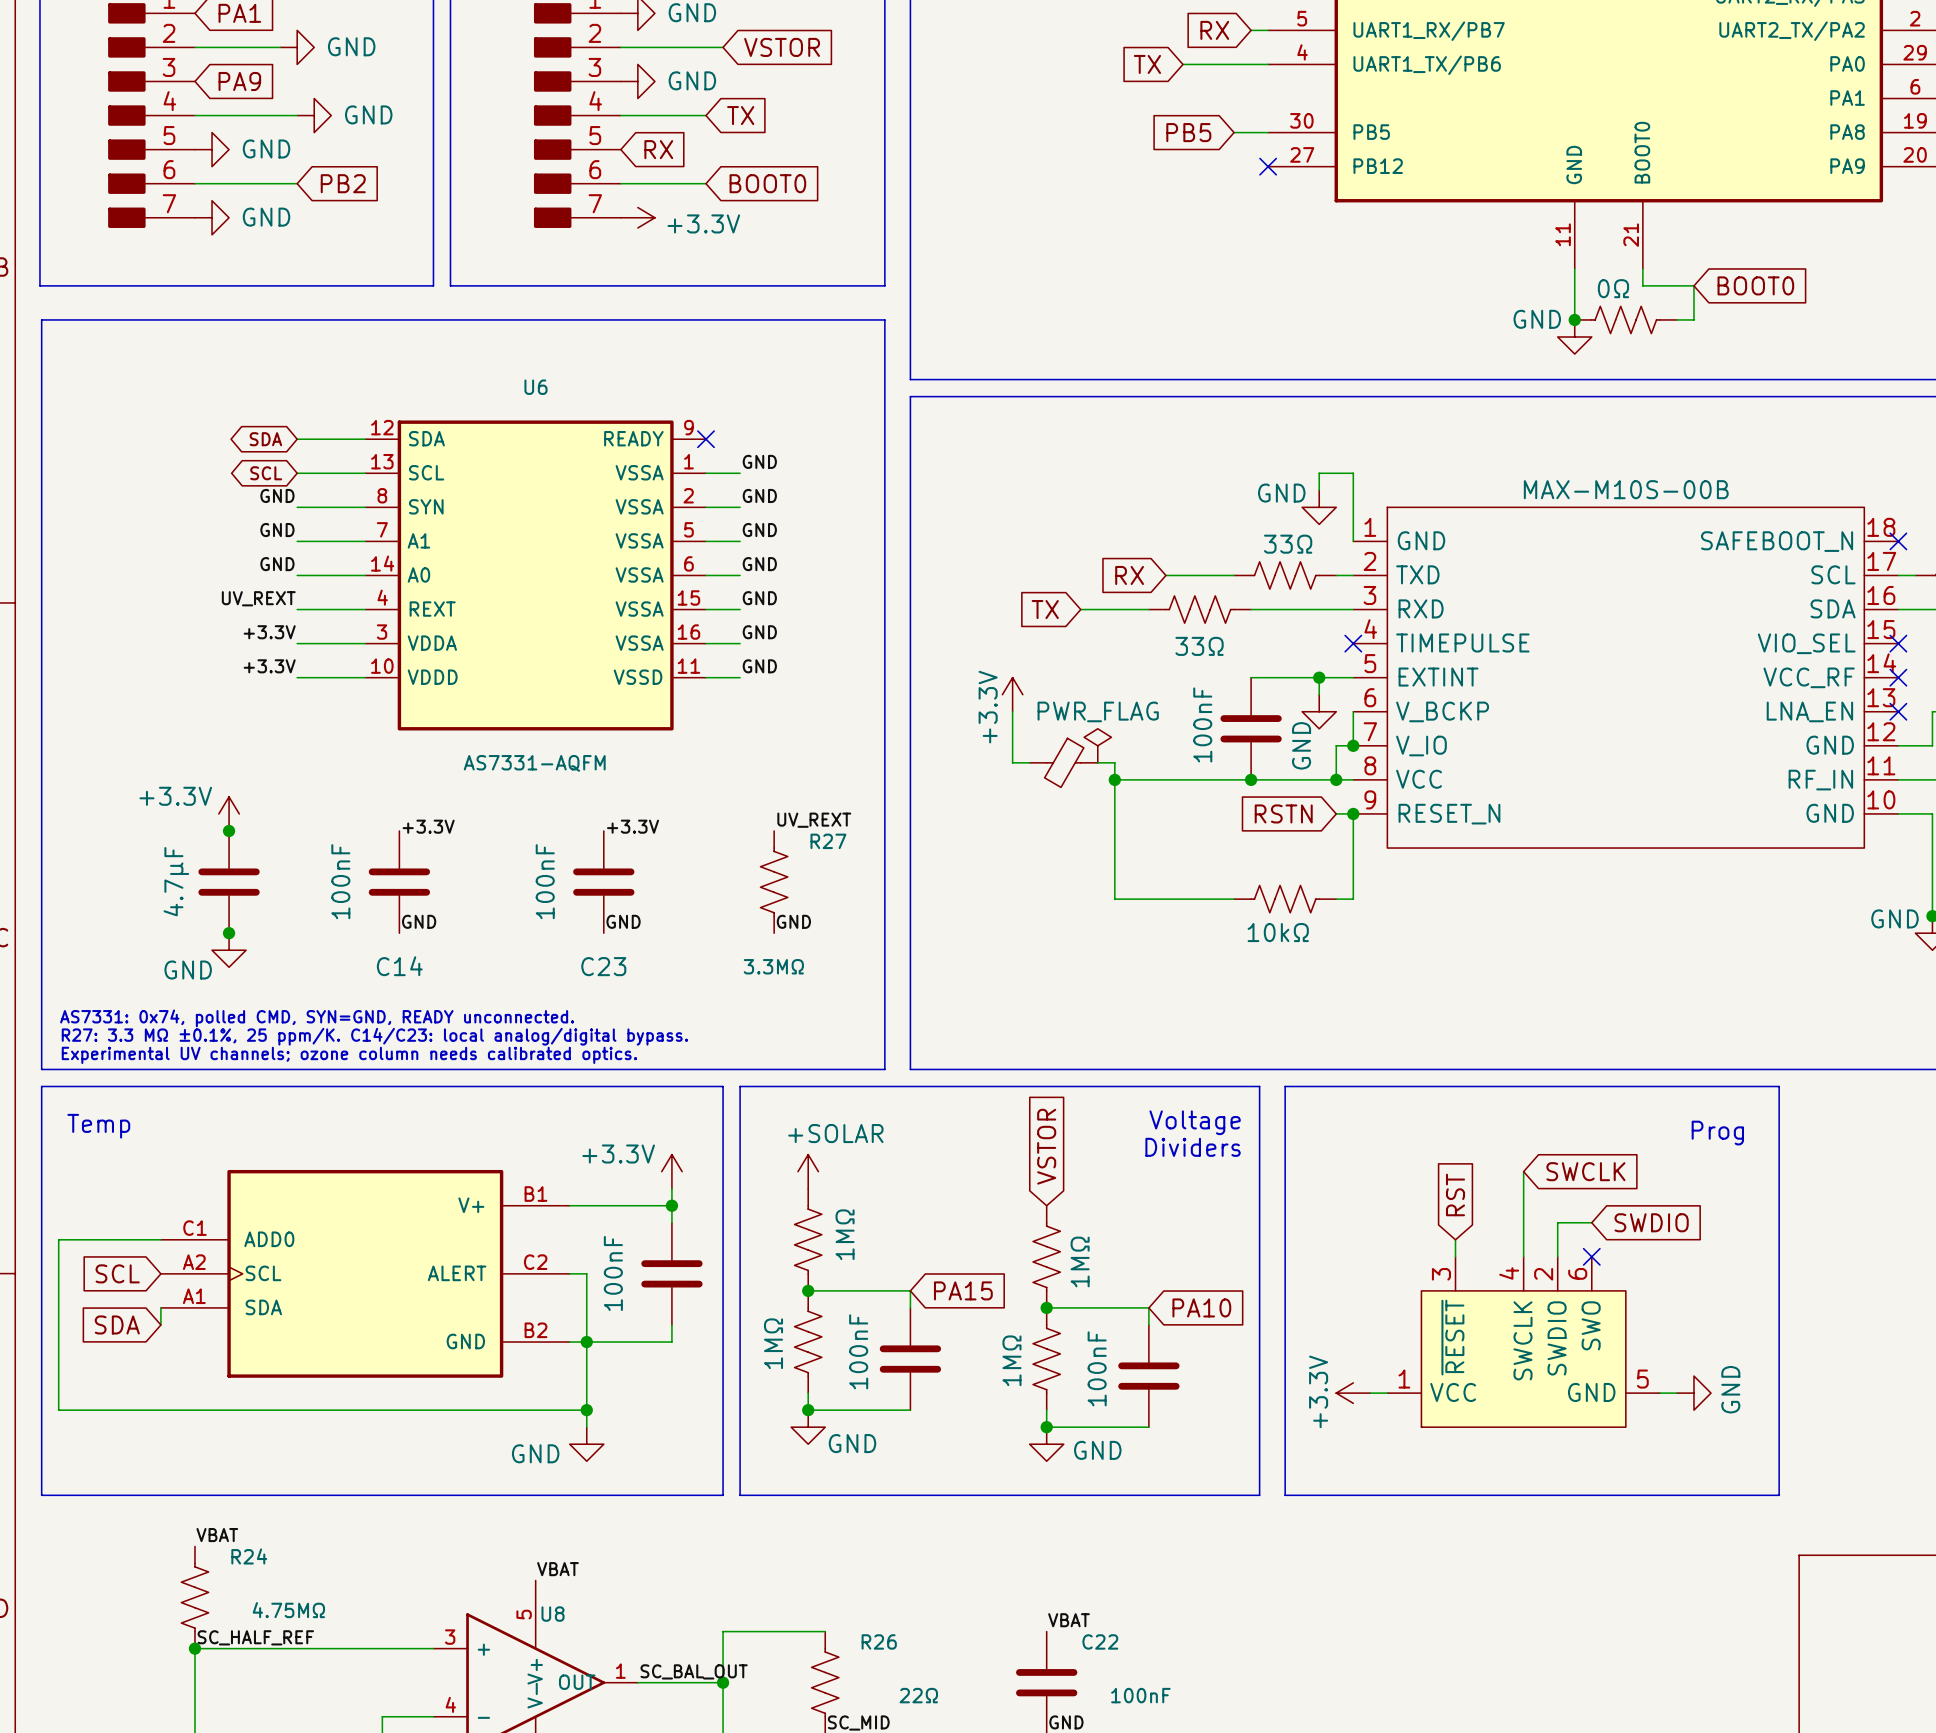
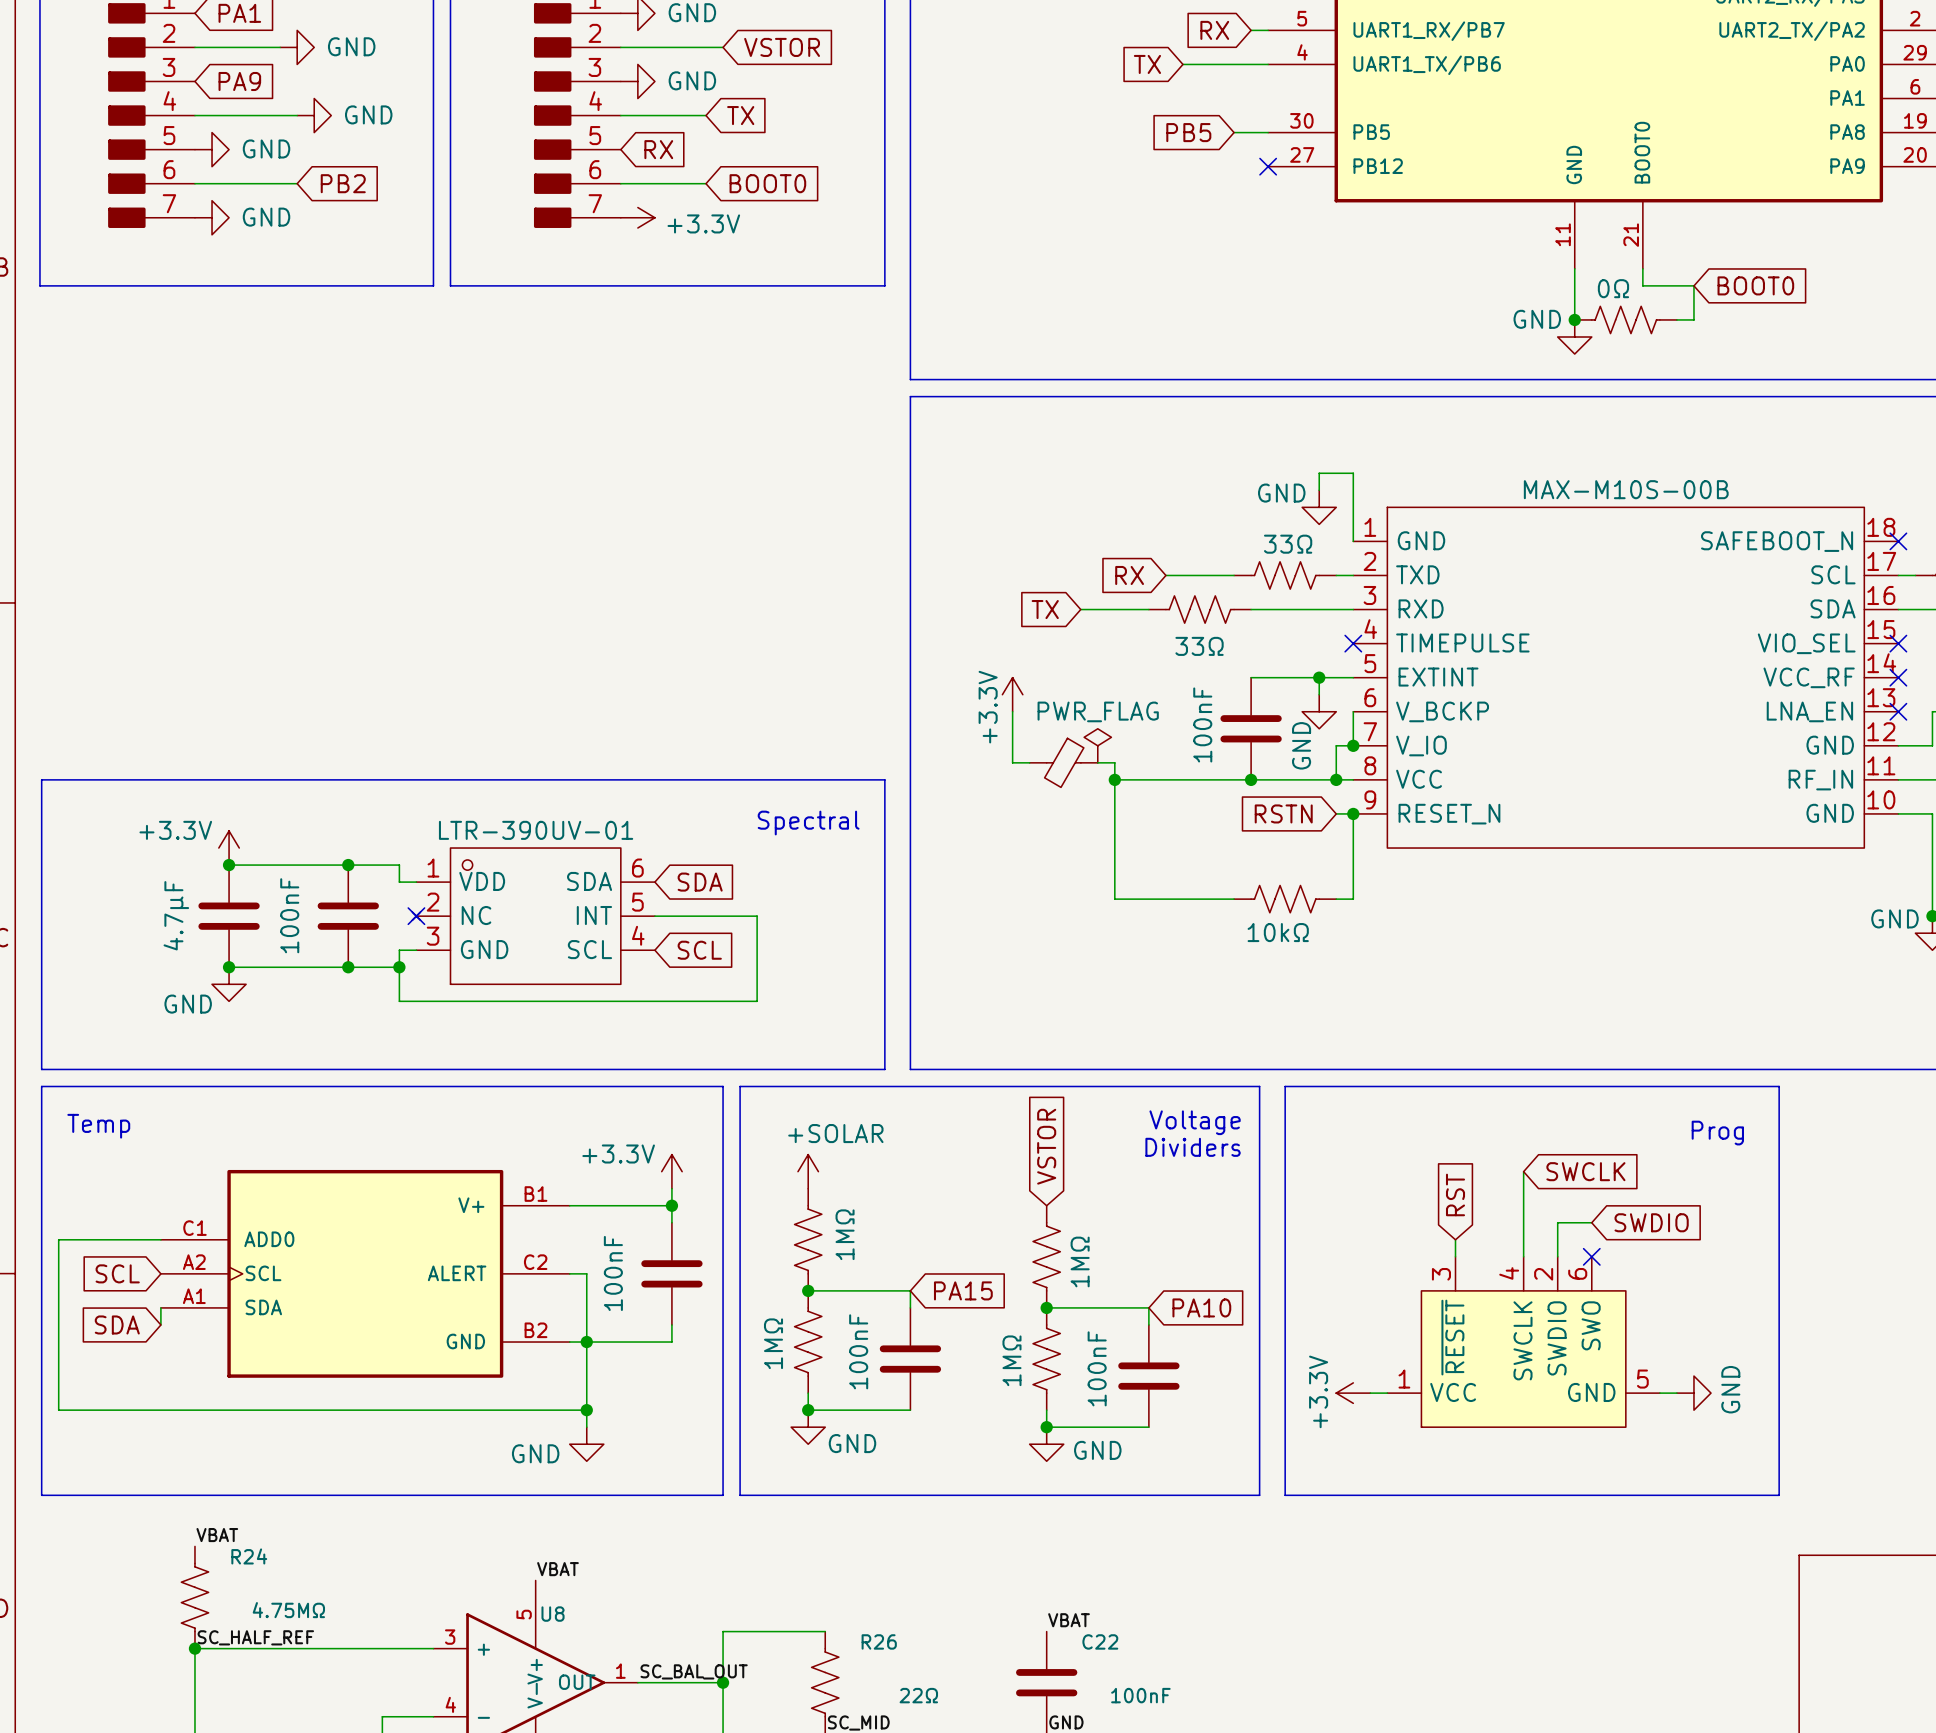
global label: SDA (265, 439) -> none
wire: (297, 439) (365, 439) -> none
no-connect mark: (706, 439) -> none
label: GND (759, 461) -> none
global label: SCL (266, 473) -> none
wire: (297, 473) (365, 473) -> none
wire: (706, 473) (740, 473) -> none
label: GND (277, 495) -> none
label: GND (759, 495) -> none
wire: (297, 507) (365, 507) -> none
wire: (706, 507) (740, 507) -> none
label: GND (277, 530) -> none
label: GND (759, 530) -> none
wire: (297, 541) (365, 541) -> none
wire: (706, 541) (740, 541) -> none
label: GND (277, 564) -> none
label: GND (759, 564) -> none
wire: (297, 575) (365, 575) -> none
U6: AS7331-AQFM (535, 575) -> none
wire: (706, 575) (740, 575) -> none
label: UV_REXT (258, 598) -> none
label: GND (759, 598) -> none
wire: (297, 609) (365, 609) -> none
wire: (706, 609) (740, 609) -> none
label: +3.3V (269, 632) -> none
label: GND (759, 632) -> none
wire: (297, 643) (365, 643) -> none
wire: (706, 643) (740, 643) -> none
label: +3.3V (269, 666) -> none
label: GND (759, 666) -> none
wire: (297, 677) (365, 677) -> none
wire: (706, 677) (740, 677) -> none
line: (41, 779) (41, 319) (884, 319) (884, 779) -> (41, 779) (884, 779)
power symbol position: +3.3V (229, 813) -> +3.3V (229, 848)
label: UV_REXT (814, 820) -> none
text: none -> Spectral (808, 823)
label: +3.3V (428, 826) -> none
label: +3.3V (633, 826) -> none
junction: (229, 830) -> none
wire: none -> (229, 865) (399, 865) (399, 882) (416, 882)
junction: none -> (229, 865)
junction: none -> (348, 865)
part position: (229, 882) -> (229, 916)
C14: 100nF (399, 882) -> none
C23: 100nF (603, 882) -> none
global label: none -> SDA (700, 882)
R27: 3.3MΩ (774, 882) -> none
part: none -> 100nF (348, 916)
no-connect mark: none -> (416, 916)
part: none -> LTR-390UV-01 (533, 916)
wire: none -> (654, 916) (757, 916) (757, 1001) (399, 1001) (399, 950) (416, 950)
label: GND (419, 921) -> none
label: GND (623, 921) -> none
label: GND (793, 921) -> none
junction: (229, 933) -> none
power symbol position: GND (229, 950) -> GND (229, 984)
global label: none -> SCL (699, 950)
wire: none -> (229, 967) (399, 967)
junction: none -> (229, 967)
junction: none -> (348, 967)
junction: none -> (399, 967)
text: AS7331: 0x74, polled CMD, SYN=GND, READY unconnected. (317, 1018) -> none
text: R27: 3.3 MΩ ±0.1%, 25 ppm/K. C14/C23: local analog/digital bypass. (374, 1036) -> none
text: Experimental UV channels; ozone column needs calibrated optics. (349, 1055) -> none

